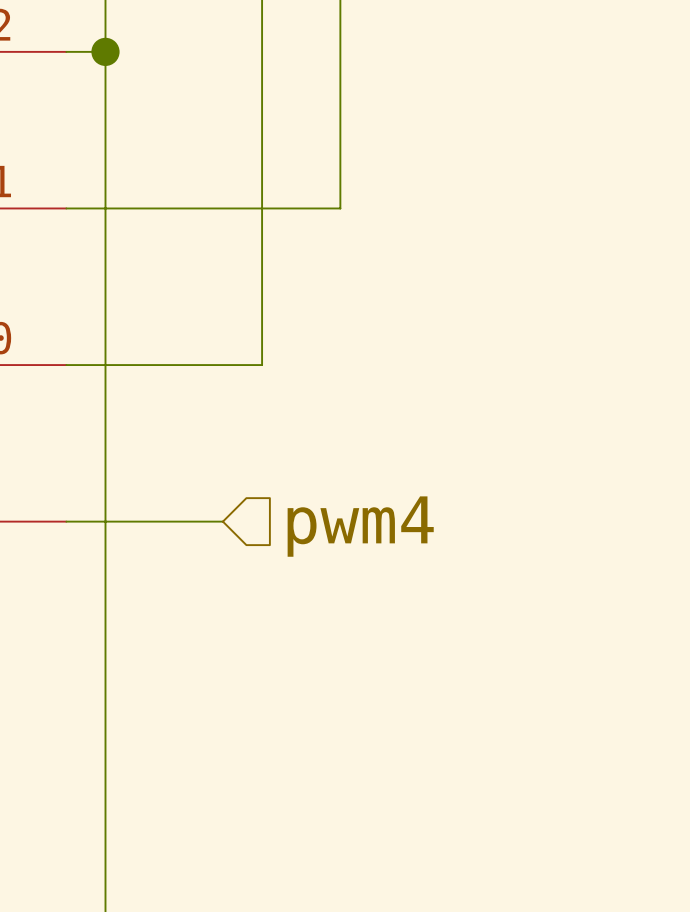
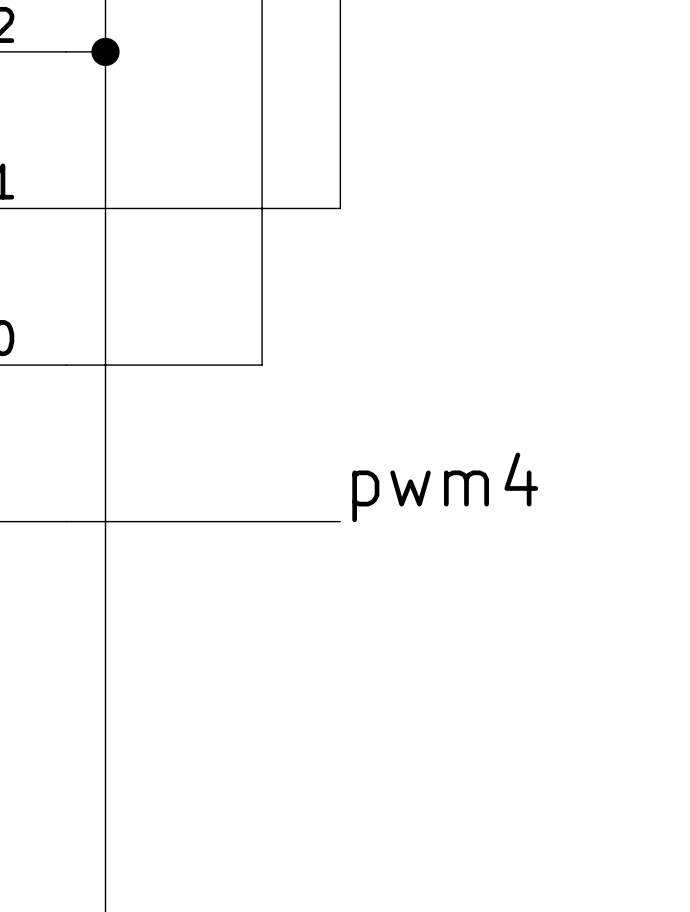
label: none -> pwm4 (445, 487)
wire: none -> (222, 521) (340, 521)
hierarchical label: pwm4 (360, 526) -> none

